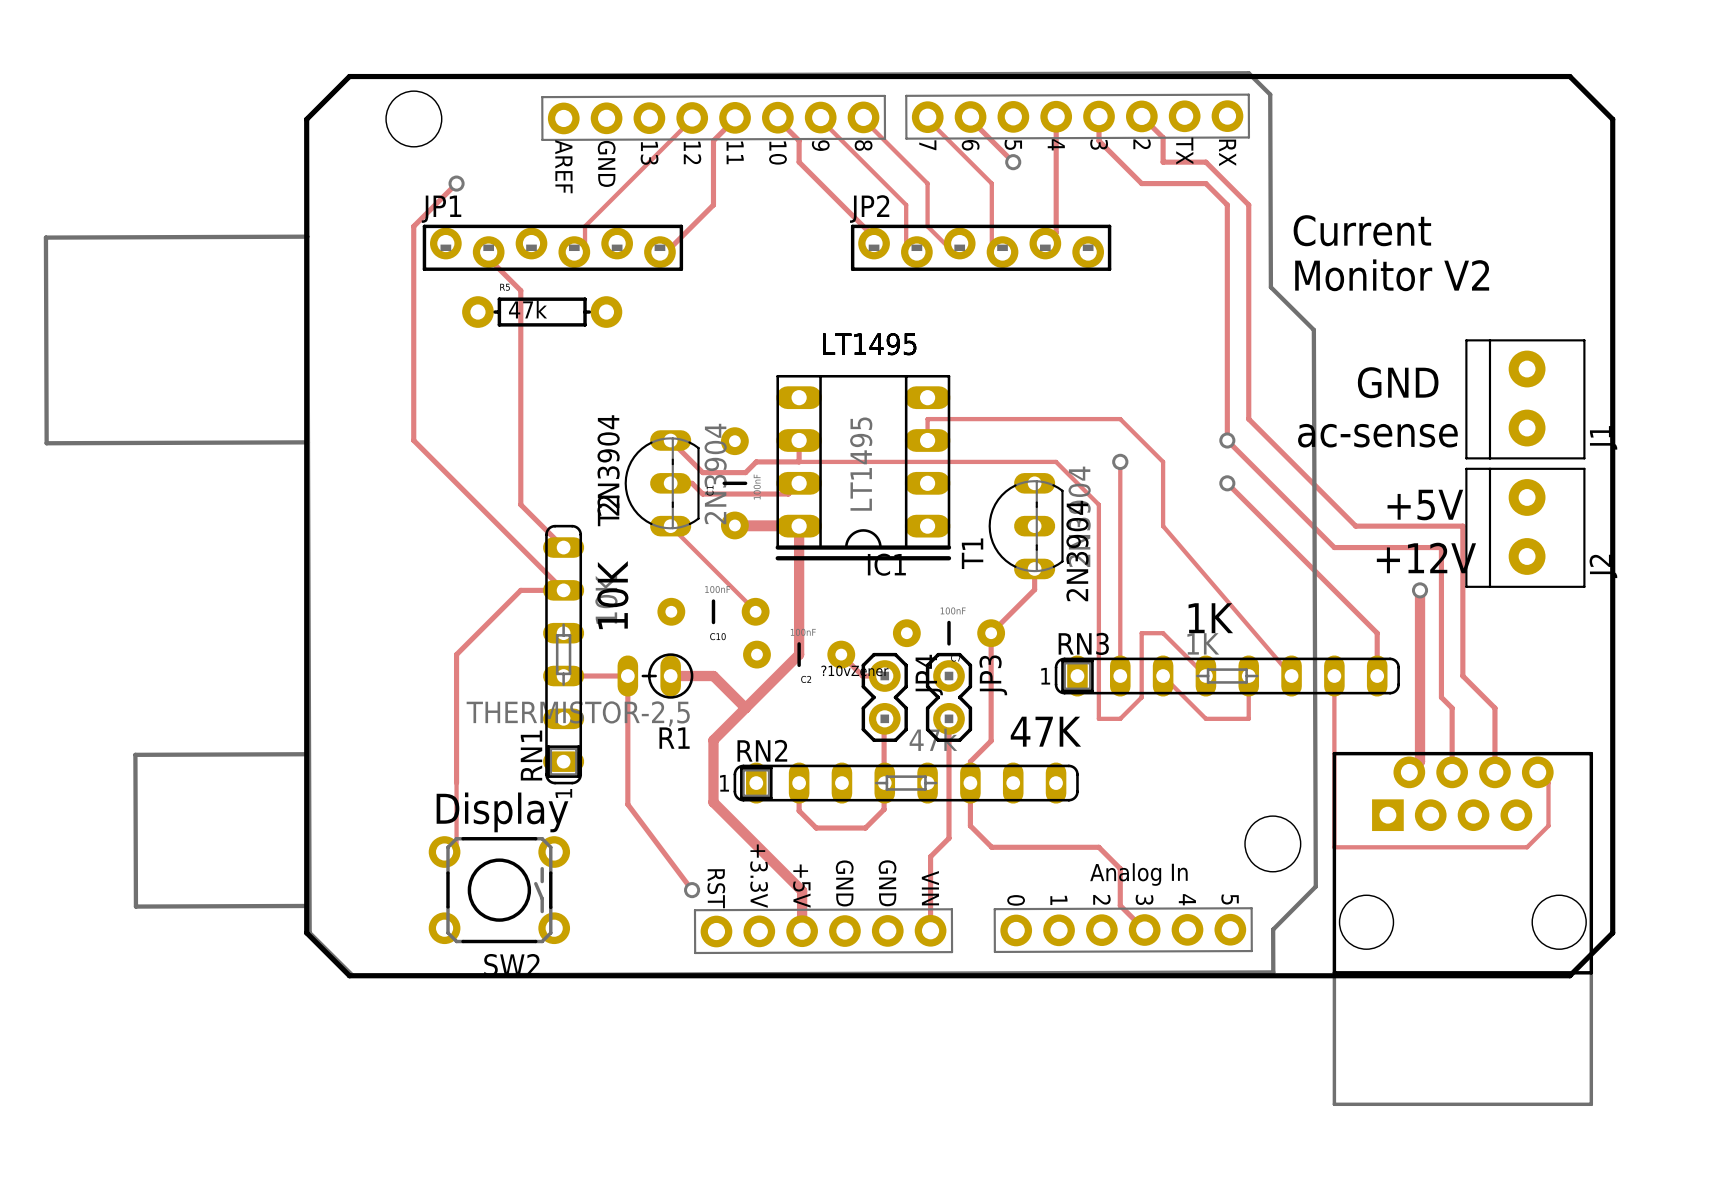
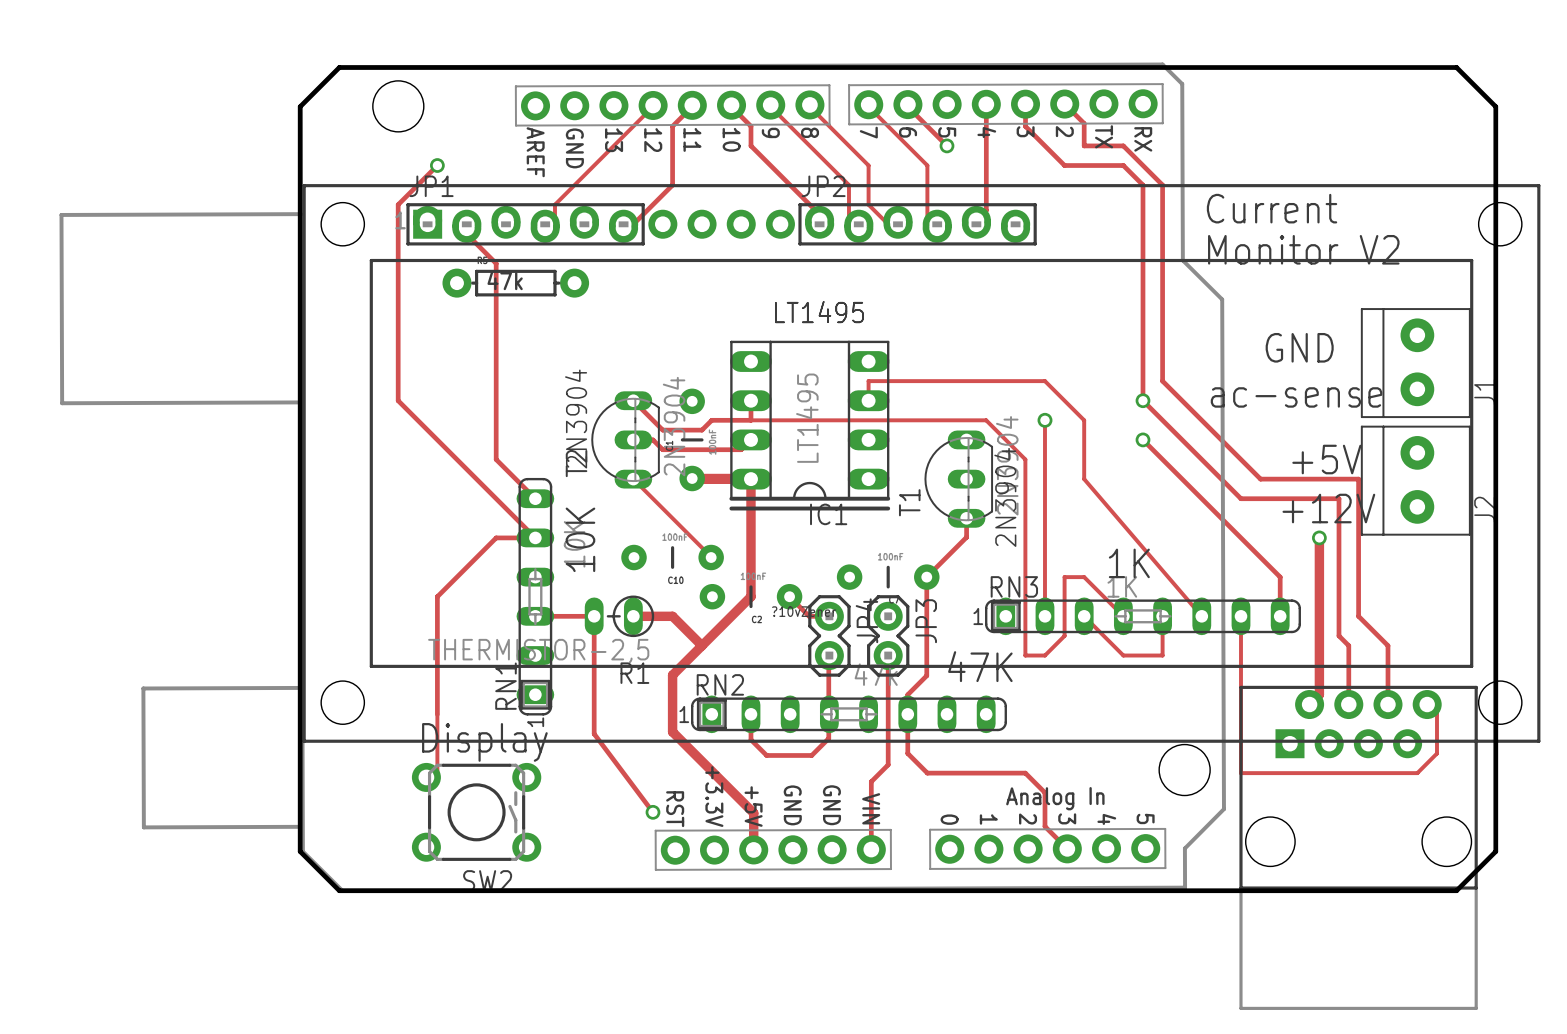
part: none -> (921, 463)

